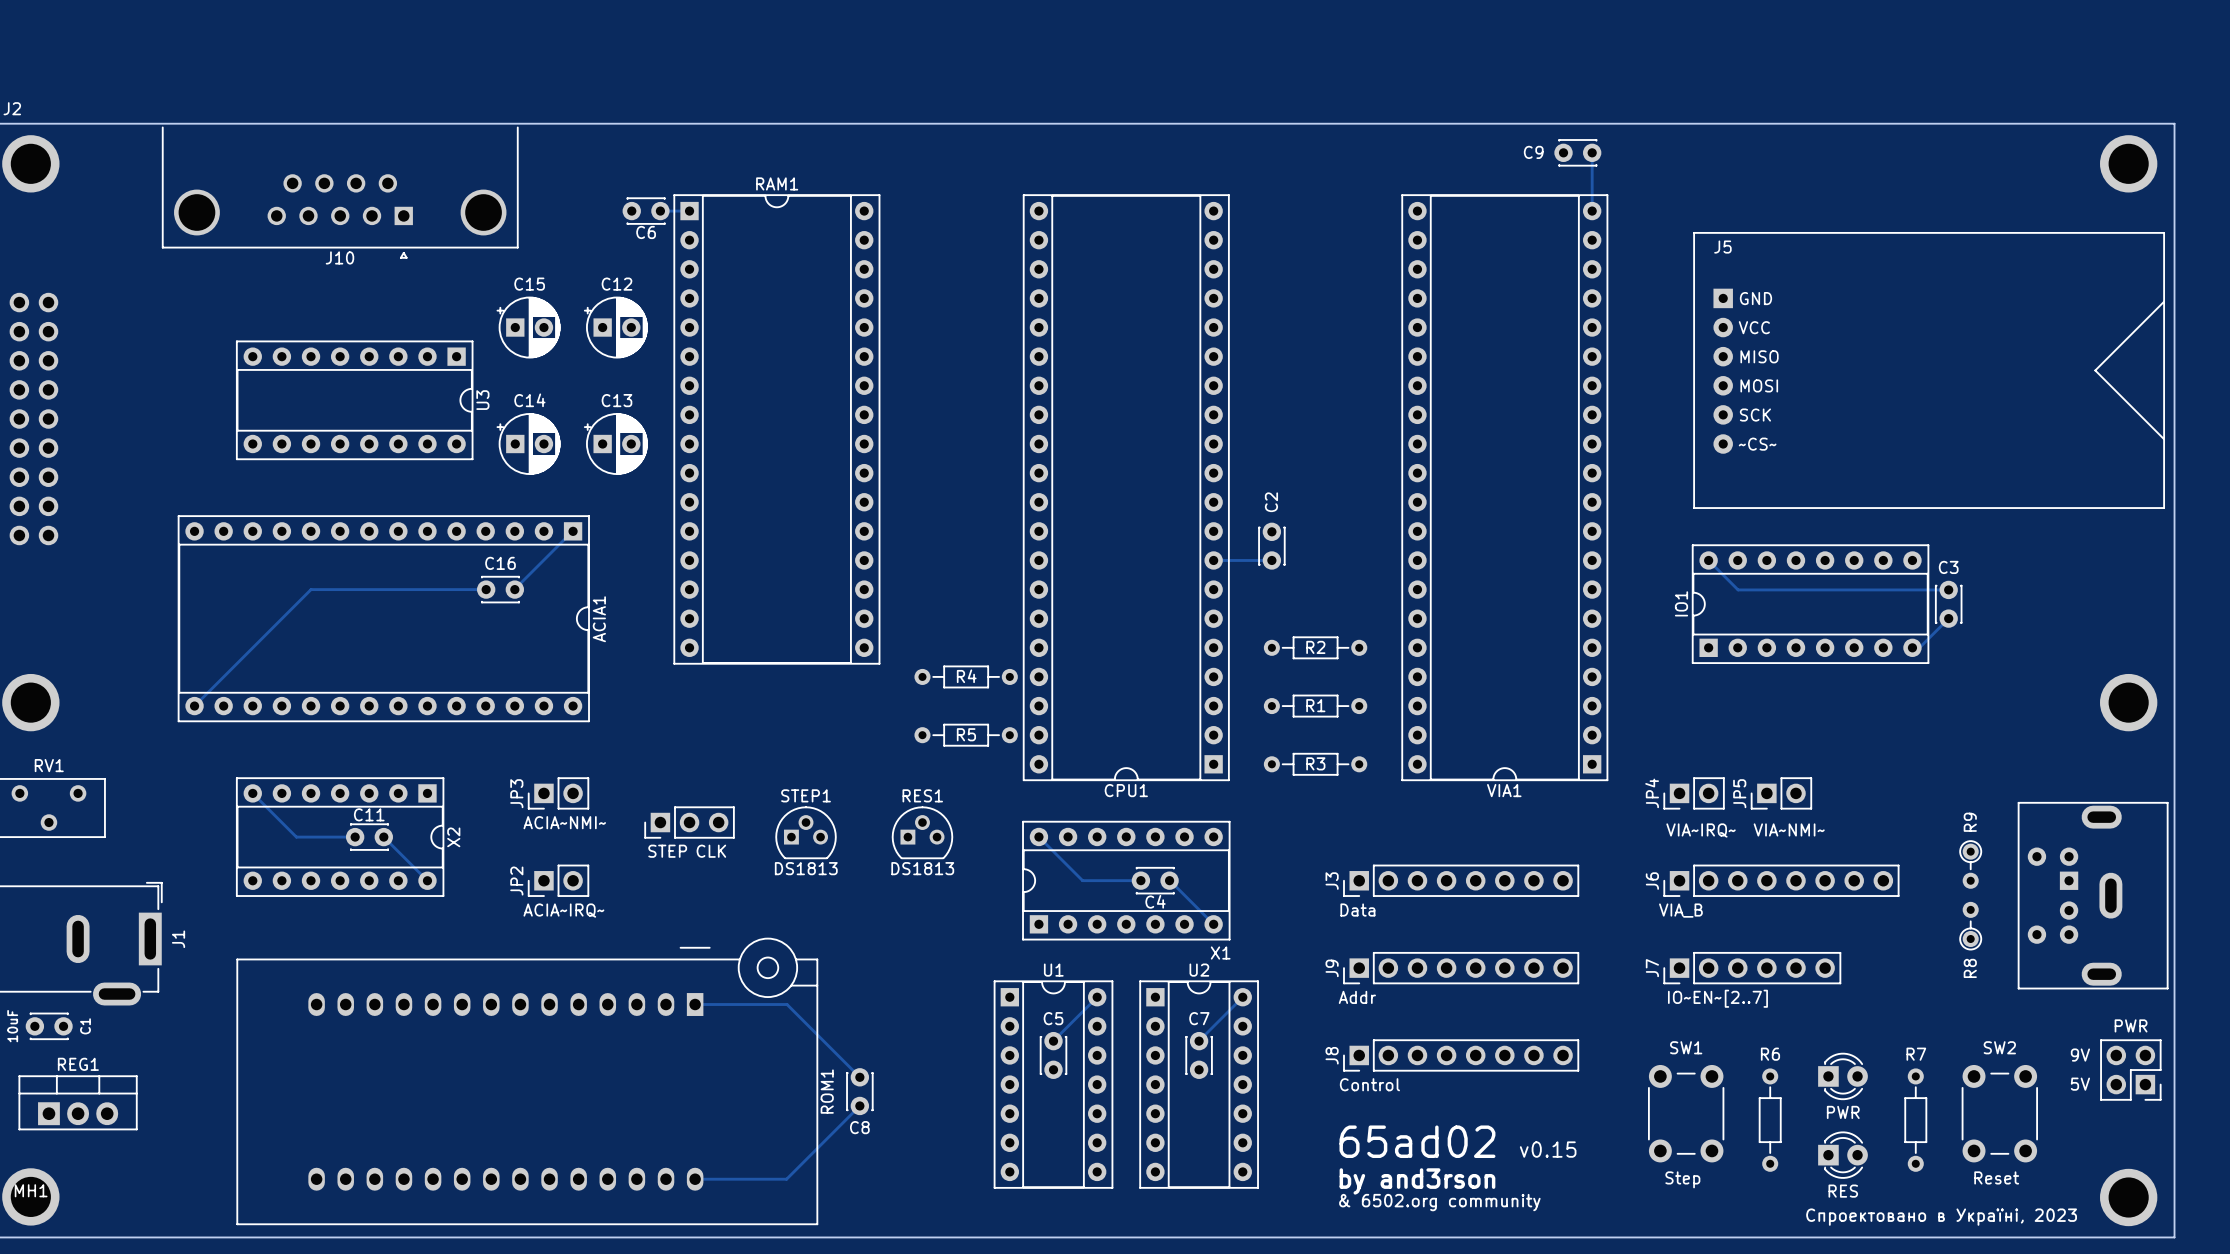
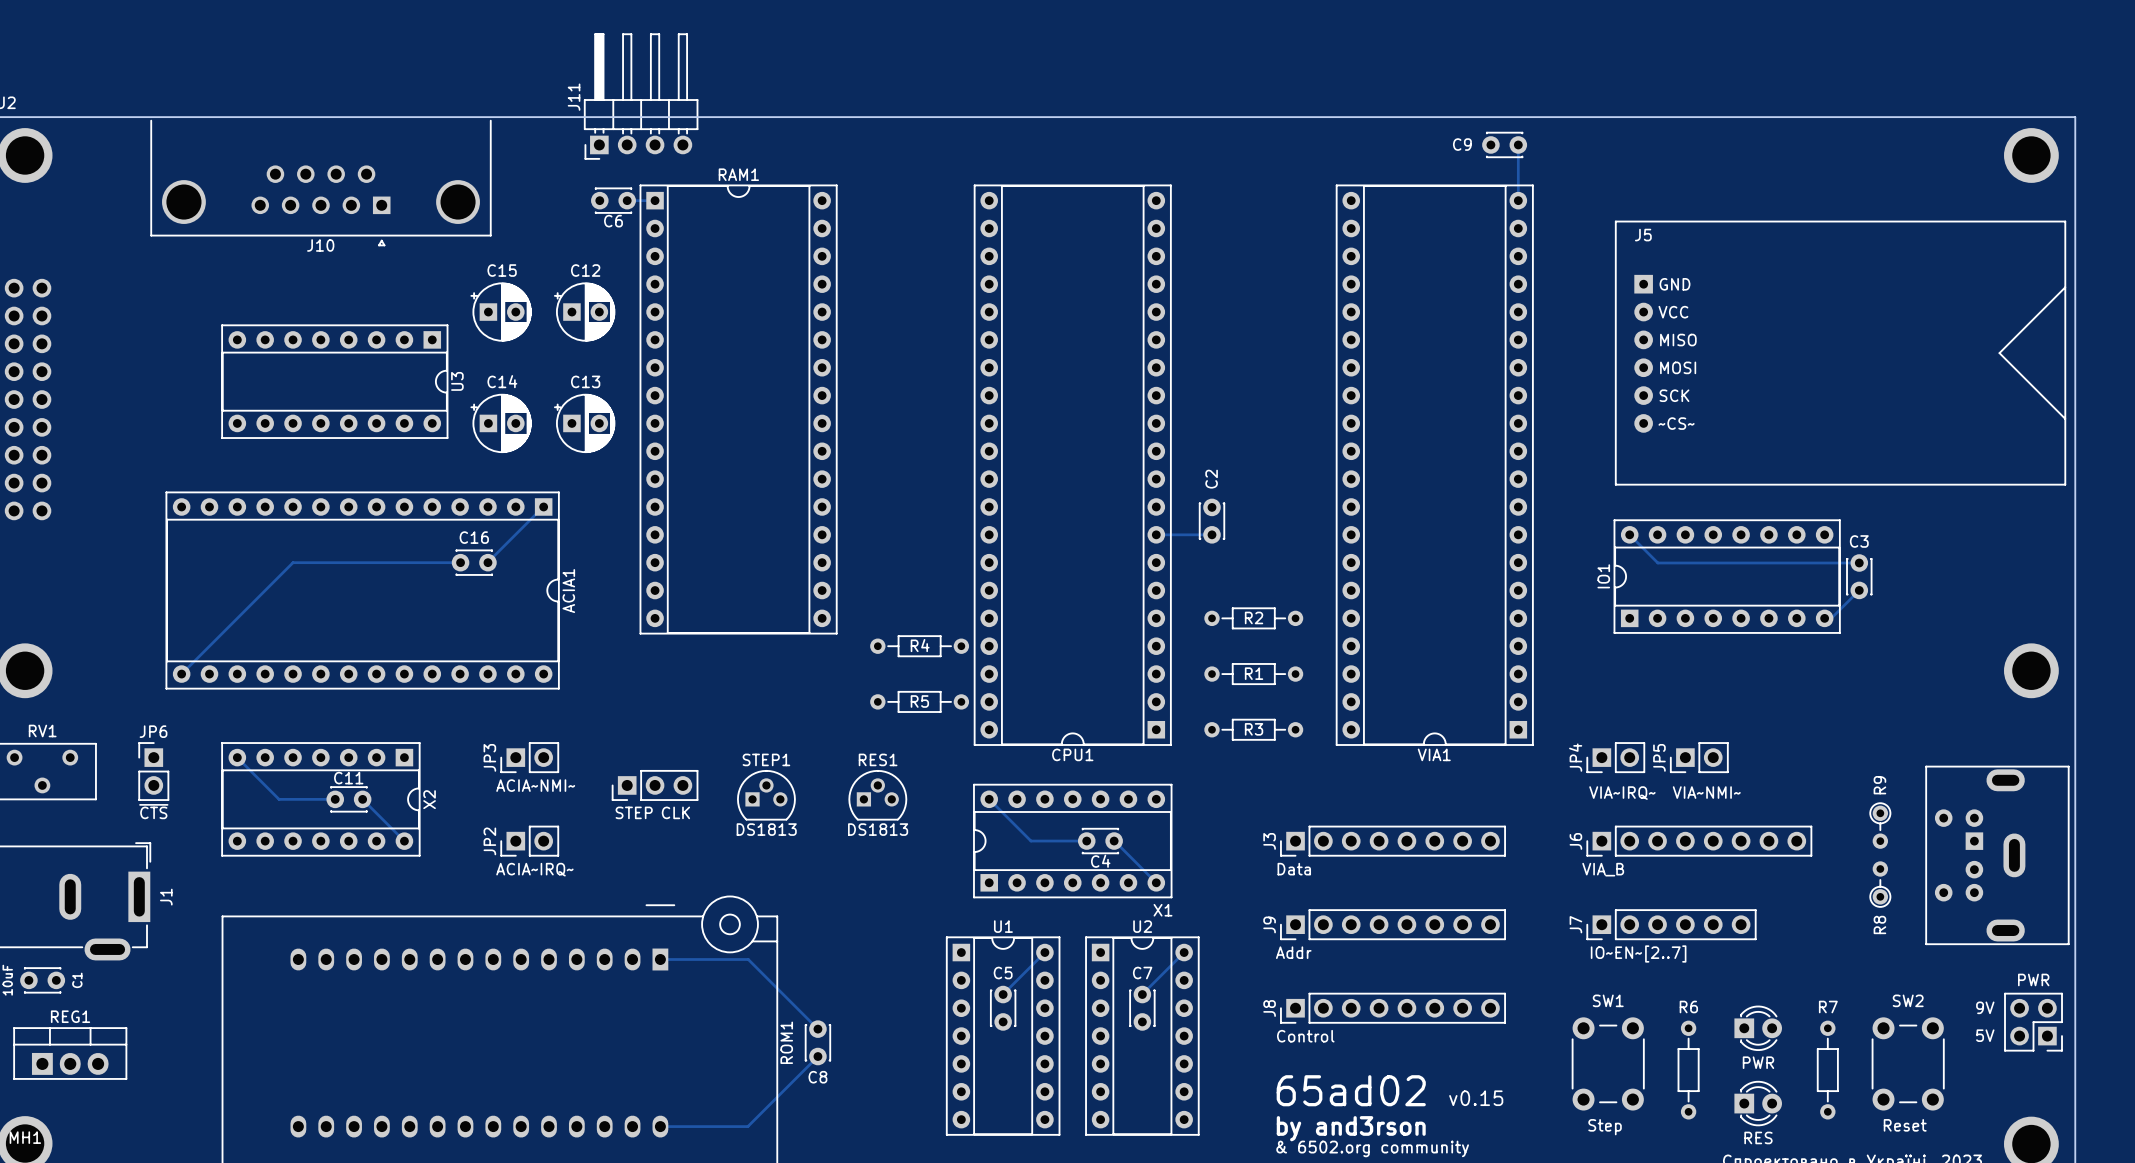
J11: none -> (641, 96)
JP6: none -> ~{CTS} (153, 771)

